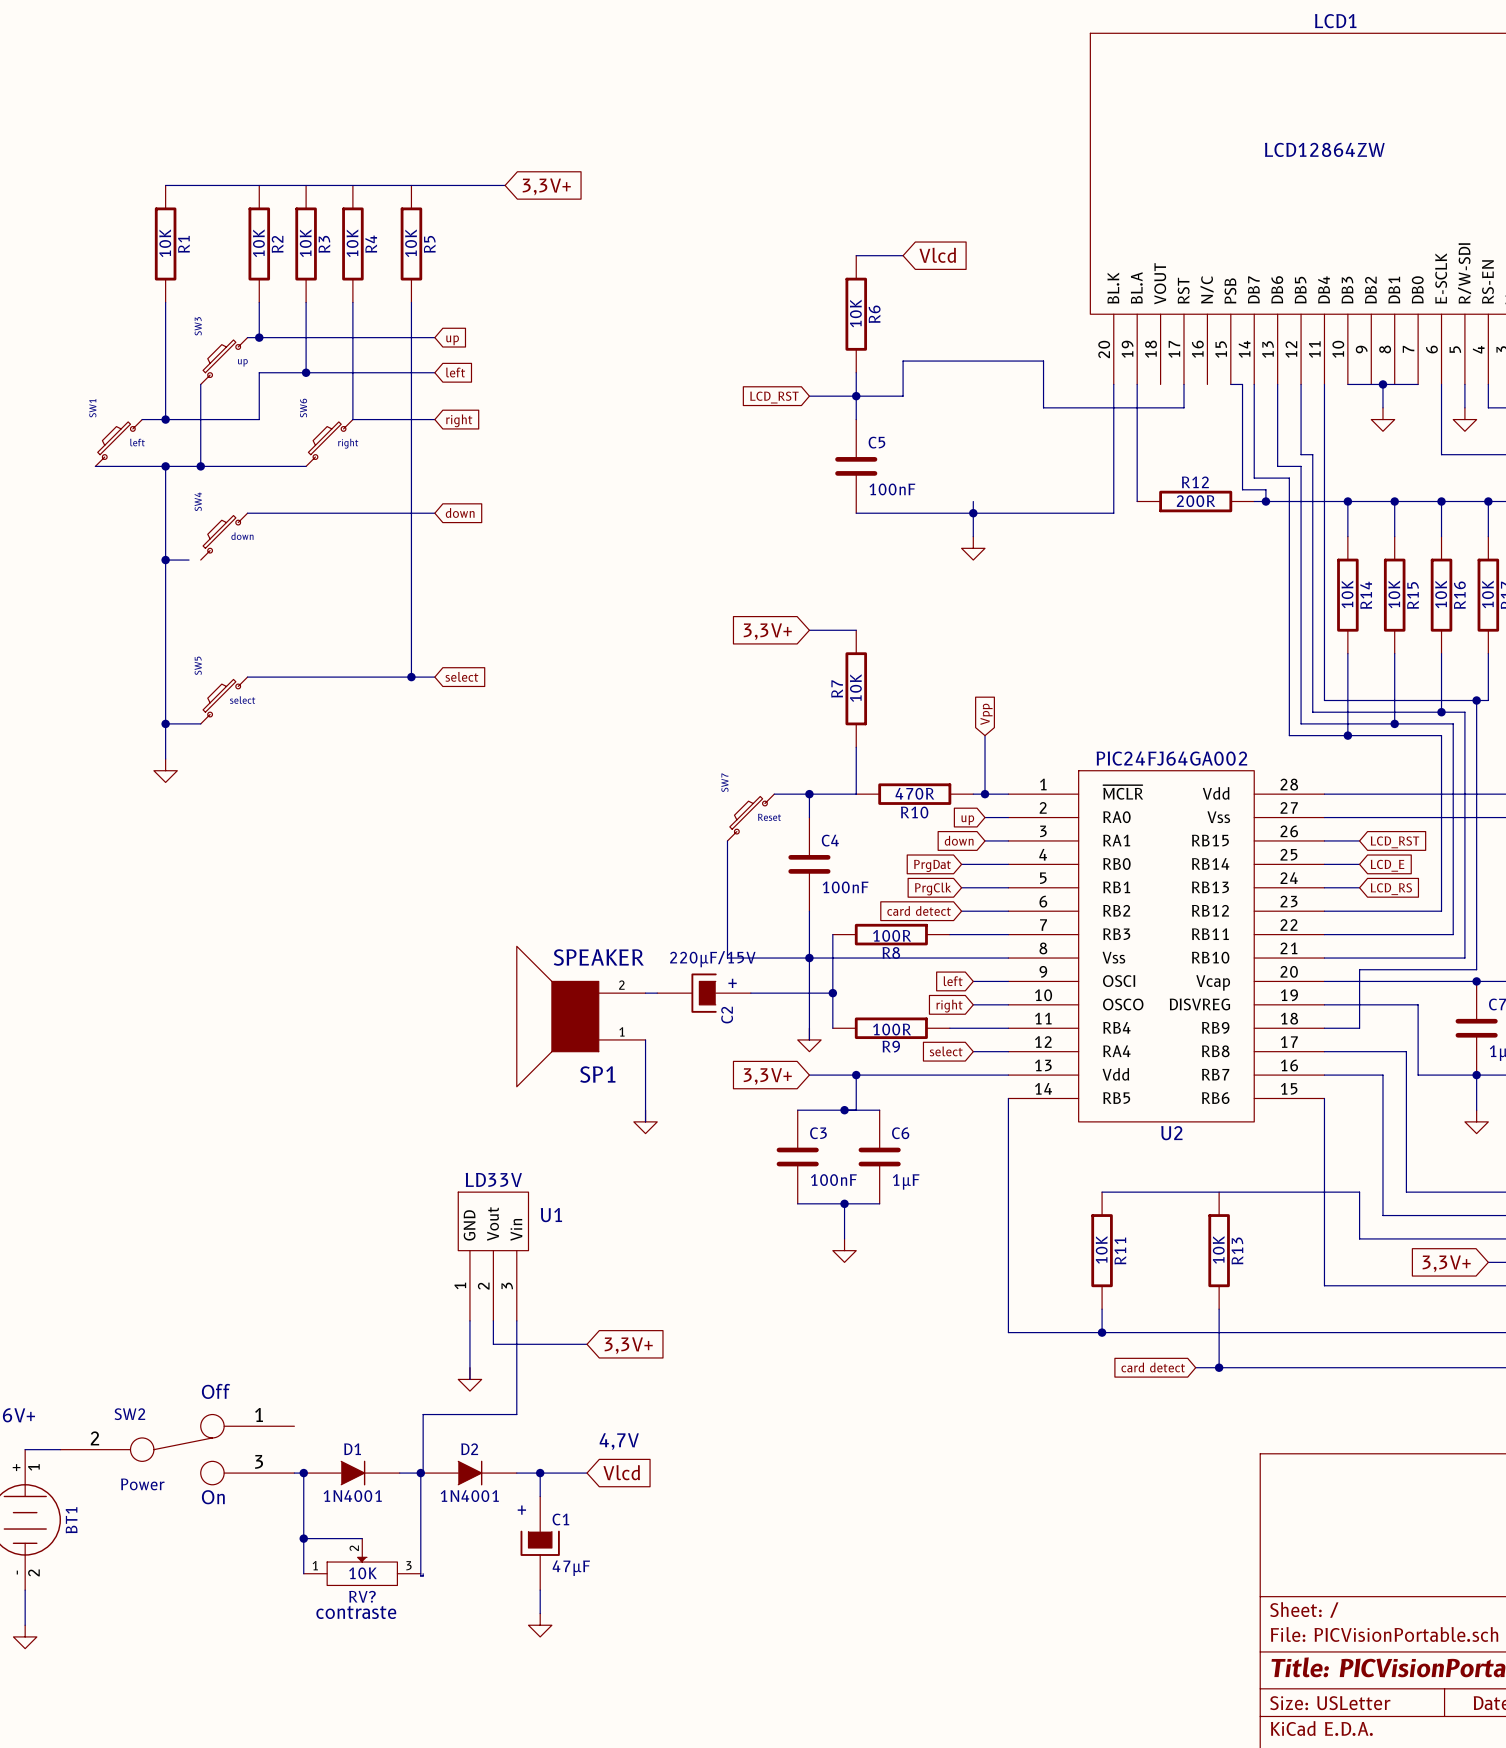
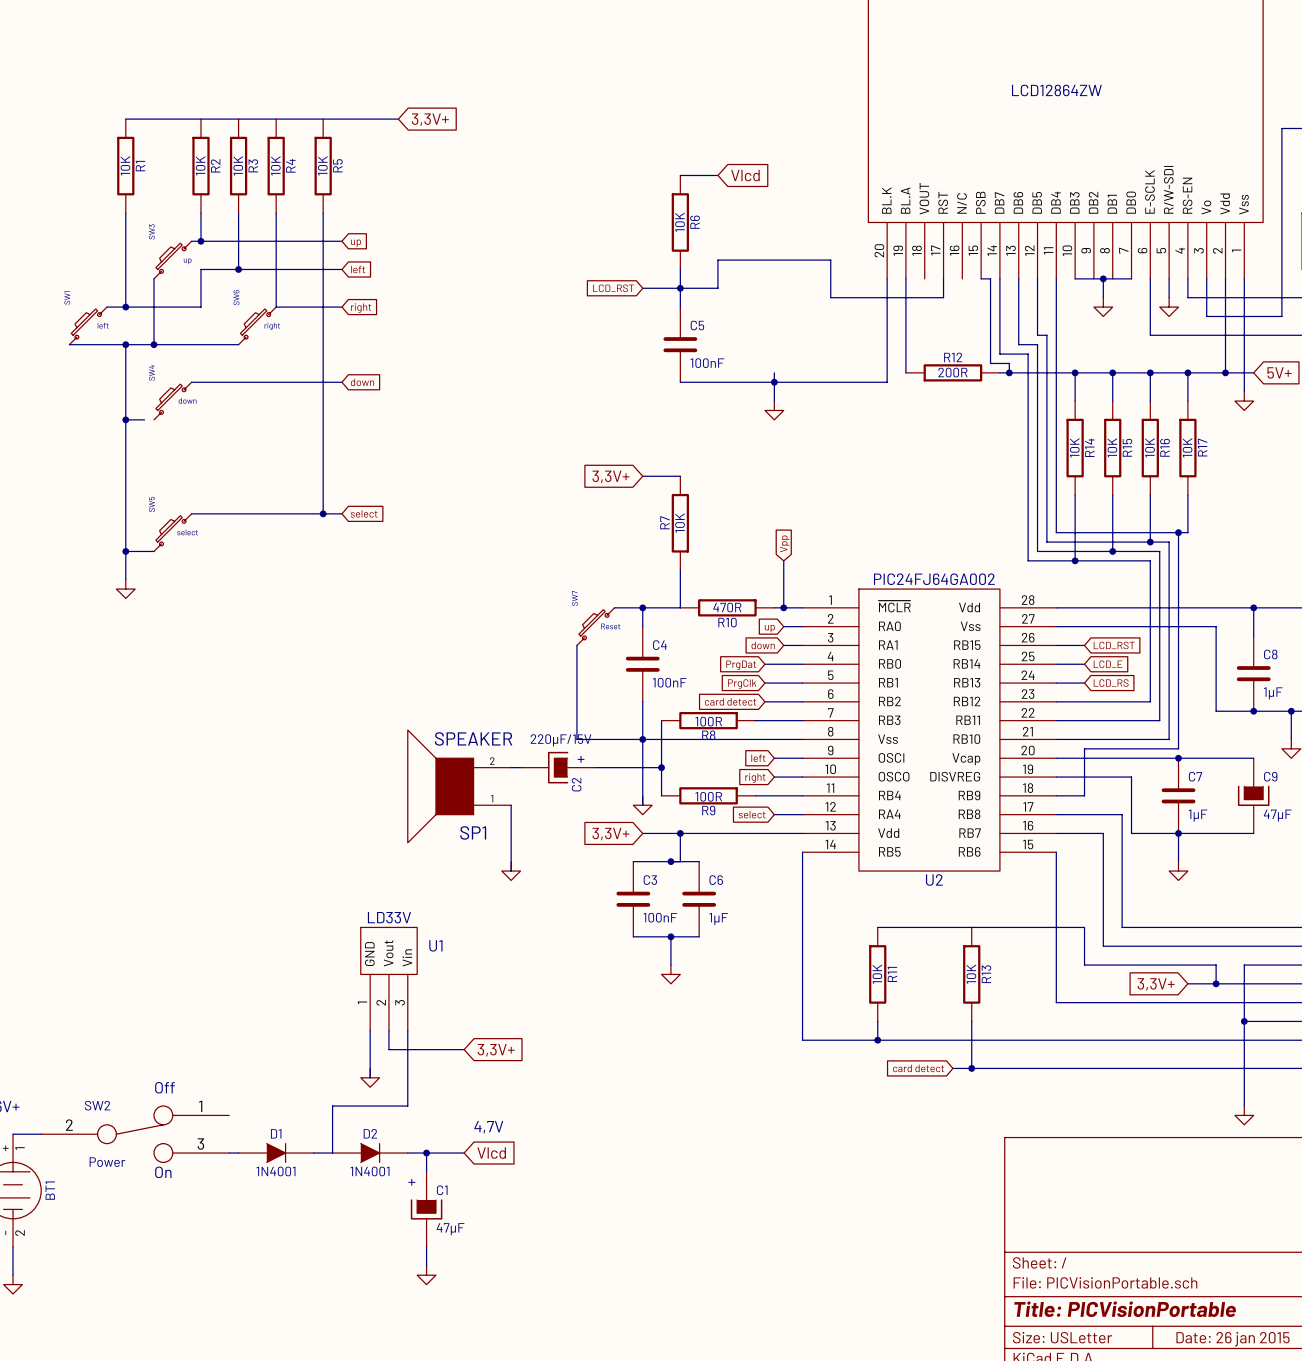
wire: (303, 1473) (303, 1573) -> none
junction: (303, 1473) -> none
wire: (420, 1473) (420, 1576) (423, 1576) (423, 1573) -> none
junction: (420, 1473) -> none
wire: (303, 1538) (362, 1538) -> none
junction: (303, 1538) -> none
RV?: 10K (362, 1562) -> none
text: contraste (356, 1612) -> none

